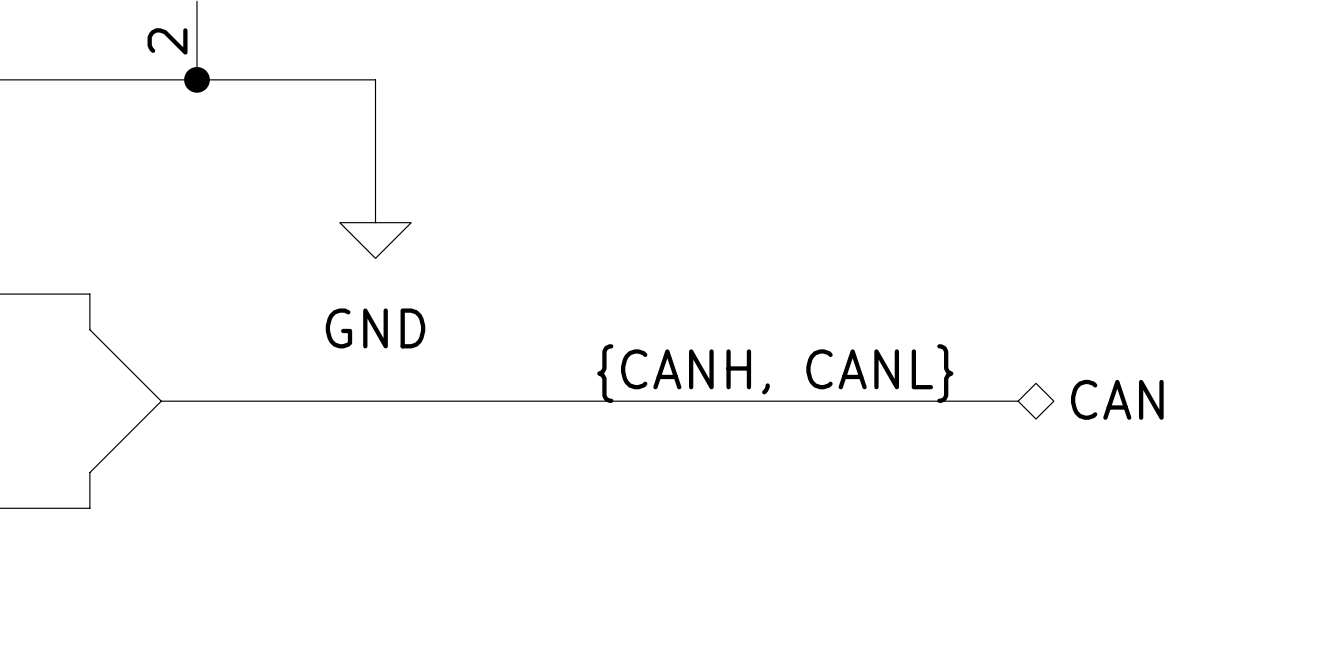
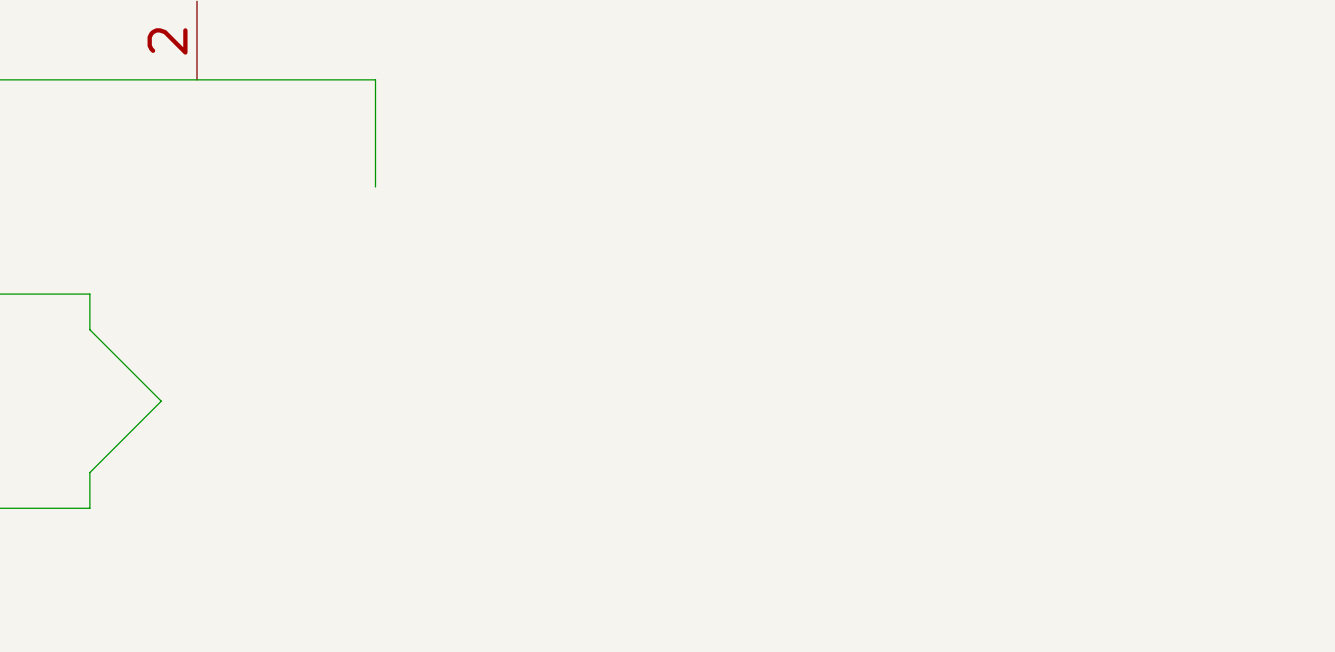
junction: (196, 79) -> none
power symbol: GND (375, 222) -> none
label: {CANH, CANL} (775, 373) -> none
hierarchical label: CAN (1117, 399) -> none
bus: (161, 401) (1018, 401) -> none

